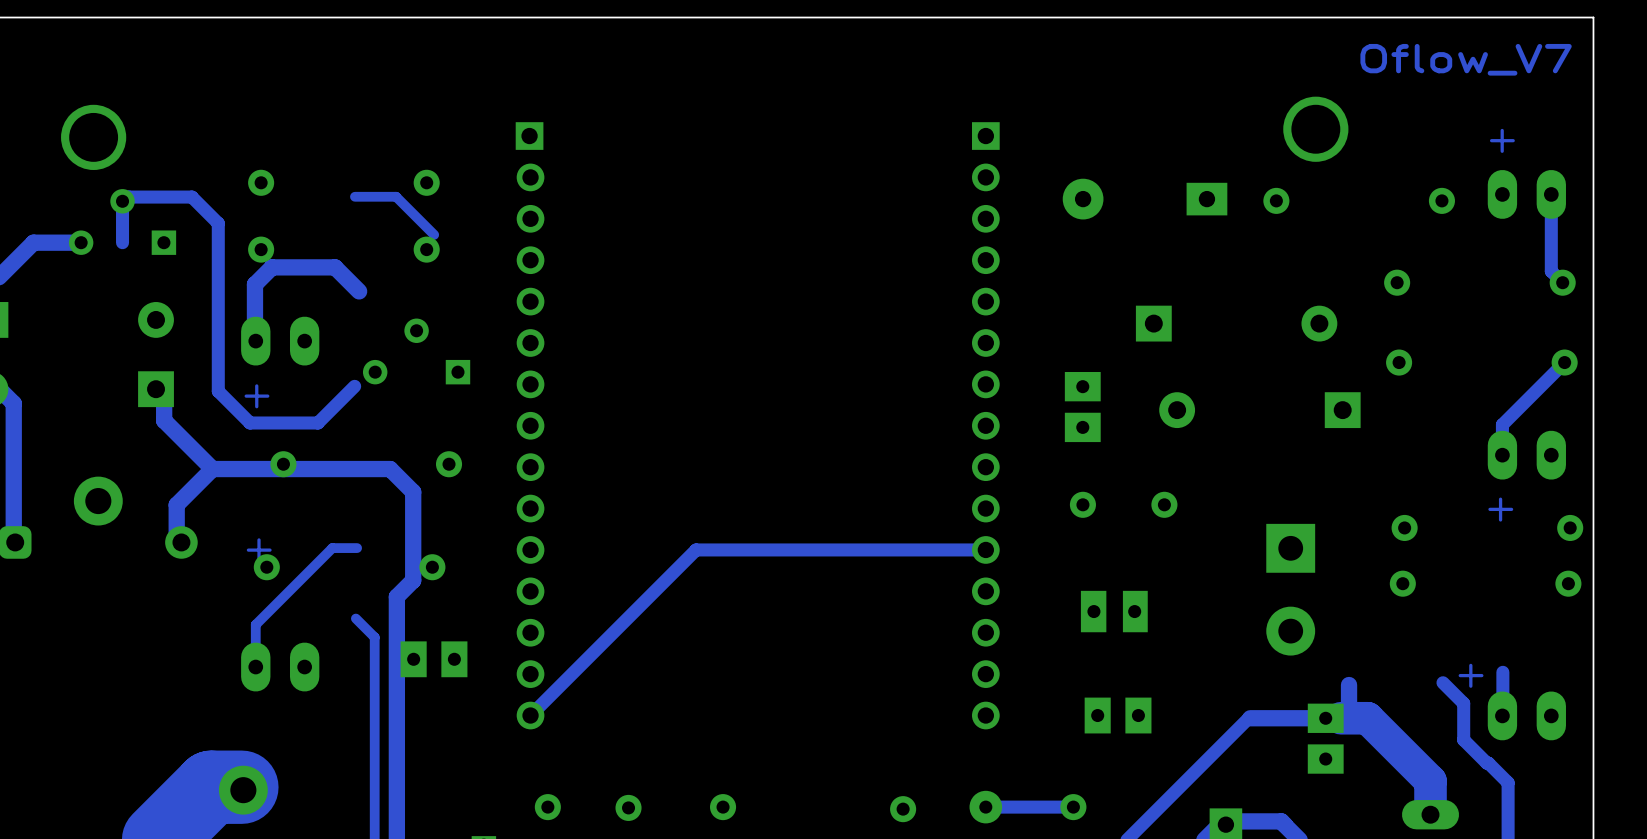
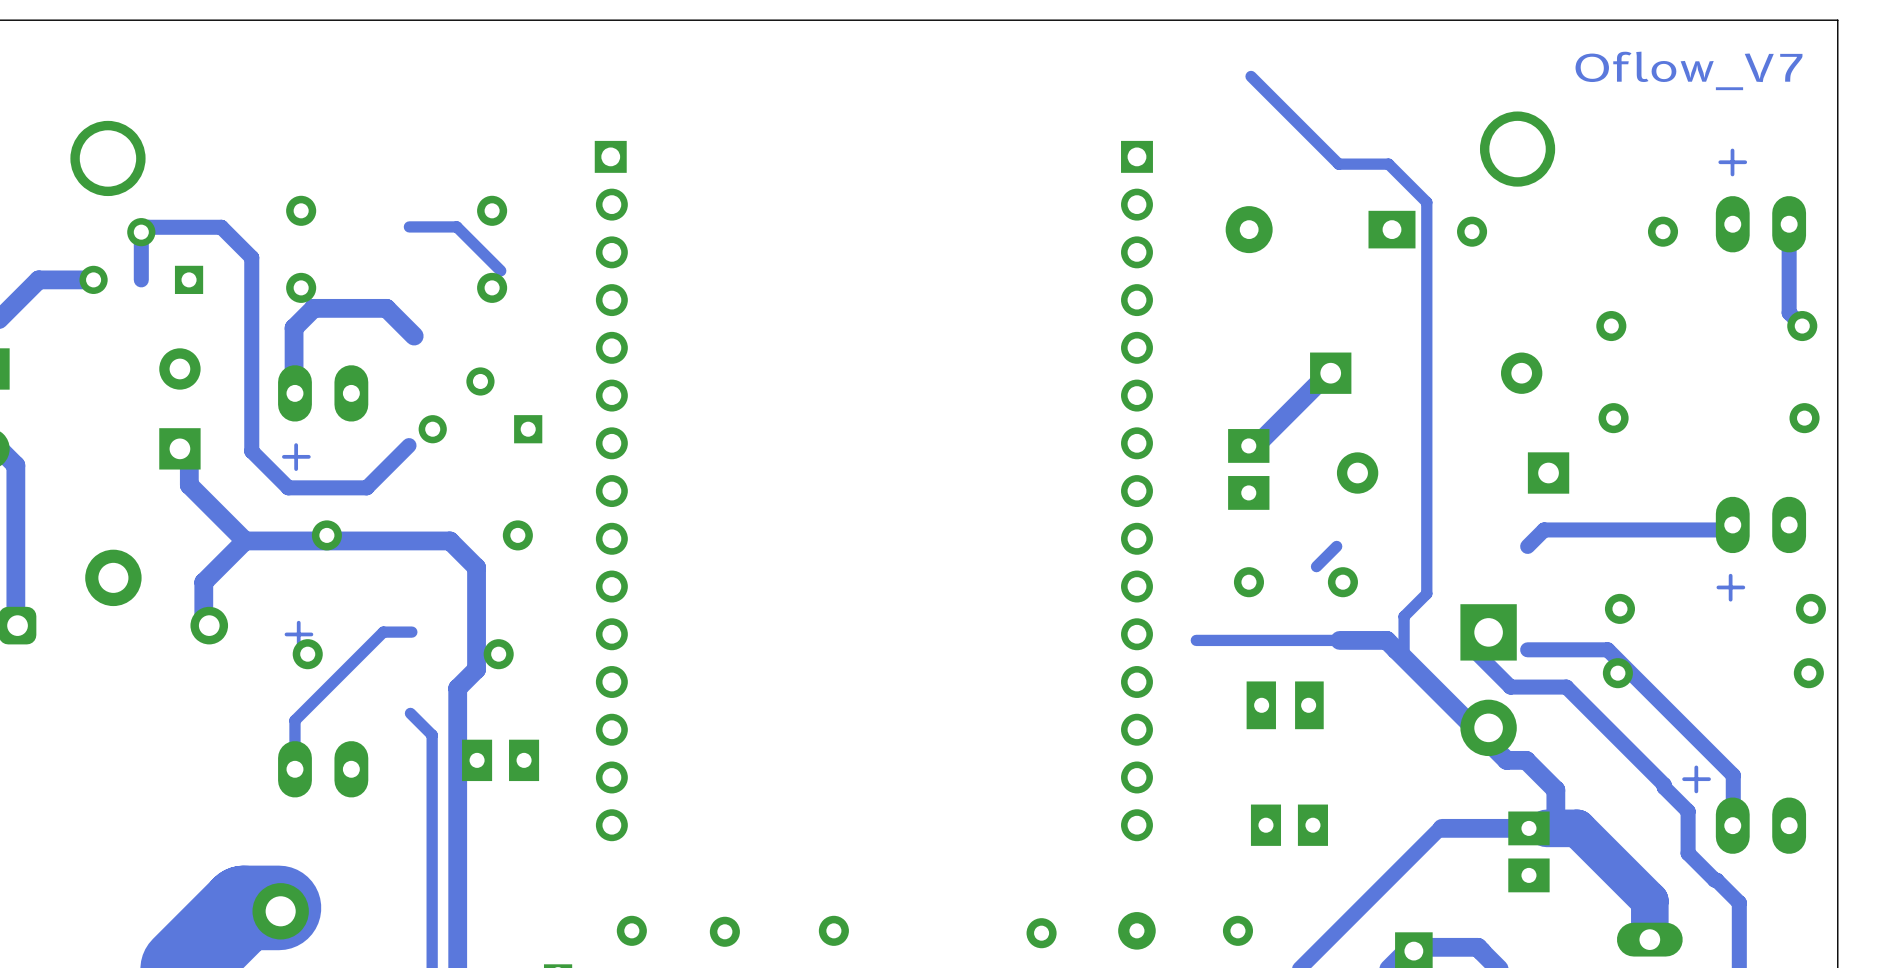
track: none -> (1251, 76) (1338, 164) (1388, 164) (1426, 202) (1426, 593) (1404, 616) (1404, 657) (1396, 649)
track: none -> (1336, 364) (1261, 440)
track: (1564, 362) (1502, 424) (1502, 455) -> none
track: none -> (1734, 526) (1730, 529) (1544, 529) (1527, 546)
track: none -> (1336, 546) (1316, 566)
track: (985, 549) (696, 549) (530, 715) -> none
track: none -> (1336, 640) (1196, 640)
track: none -> (1339, 640) (1386, 640) (1506, 760) (1526, 760) (1555, 790)
track: none -> (1527, 649) (1607, 649) (1733, 775)
track: none -> (1477, 653) (1510, 687) (1566, 687) (1664, 784) (1664, 787)
track: (1073, 807) (985, 807) -> none

